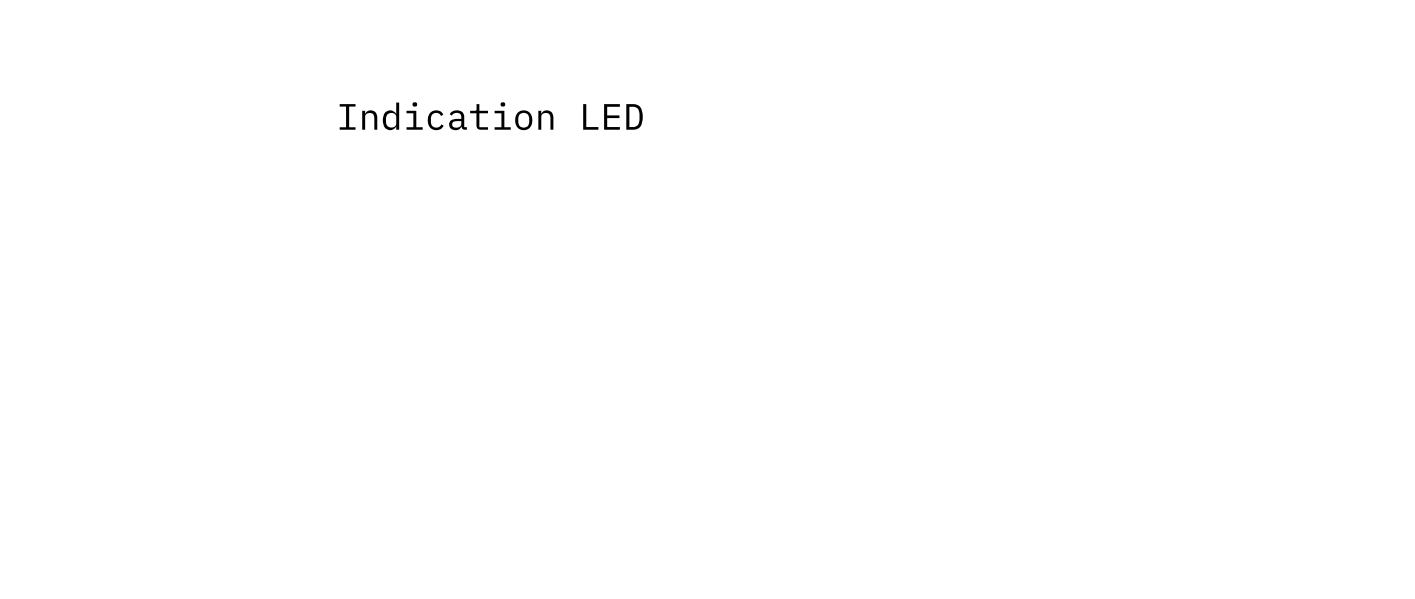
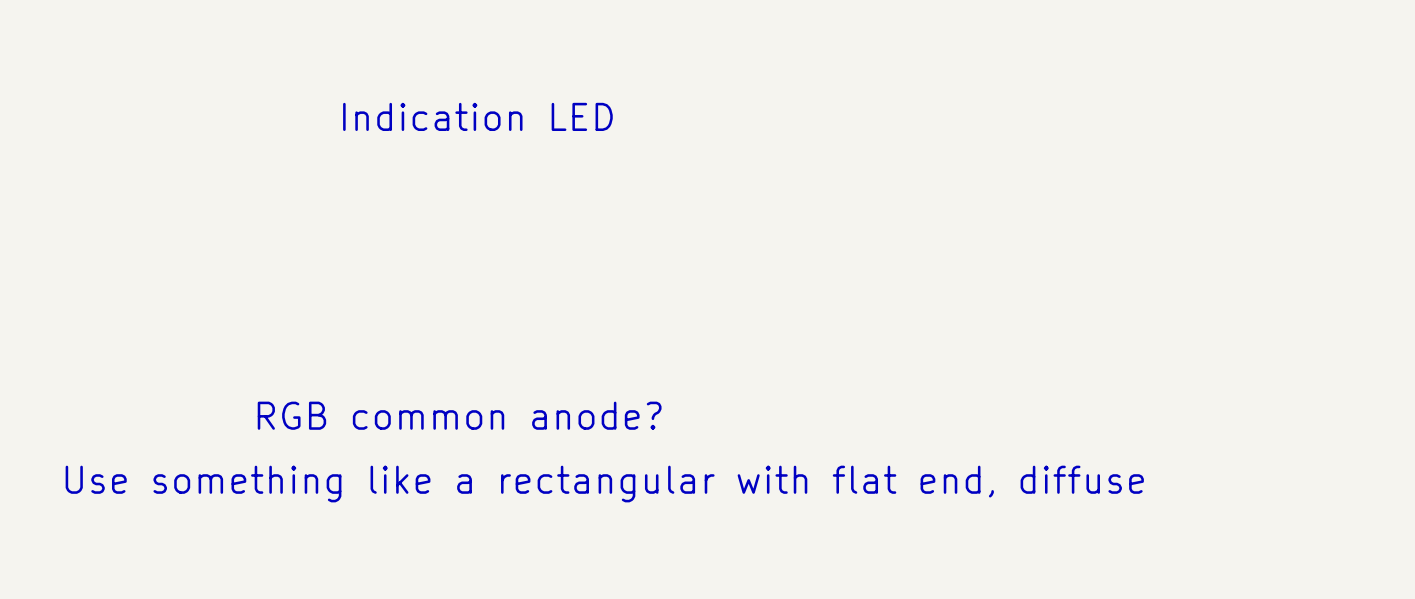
text: none -> RGB common anode? (459, 415)
text: none -> Use something like a rectangular with flat end, diffuse (604, 484)

